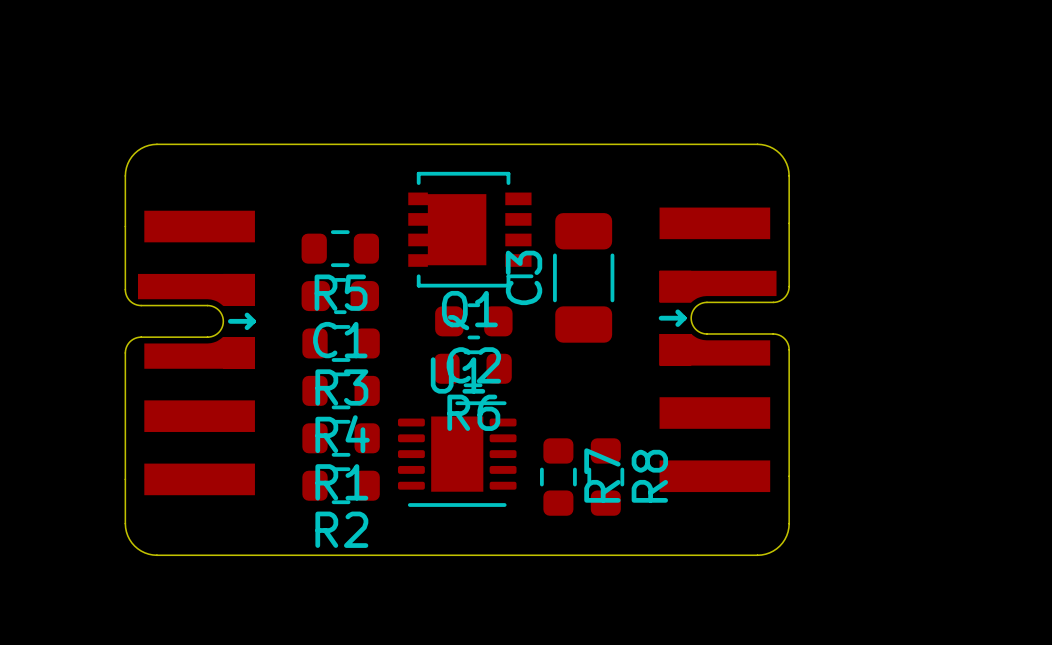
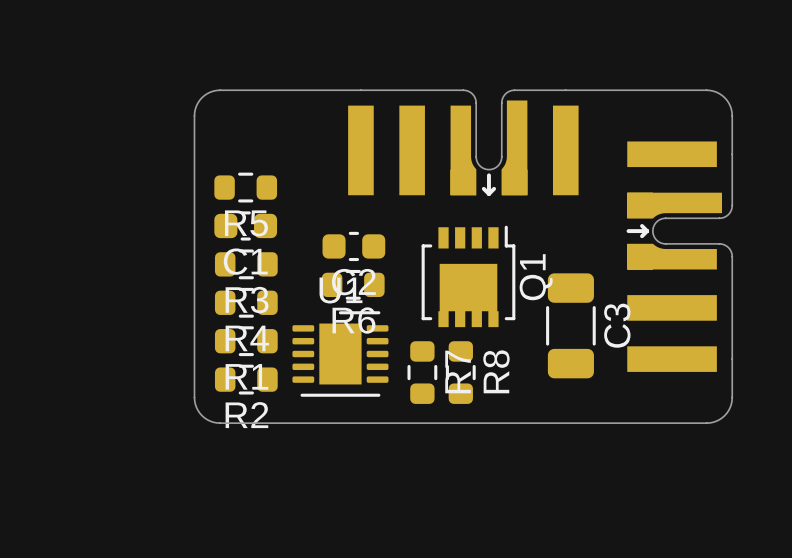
board edge: none -> (360, 90) (216, 90) (204, 95) (196, 106) (194, 115) (194, 397) (196, 407) (204, 417) (220, 423) (709, 422) (722, 417) (730, 407) (732, 397) (732, 359)
board edge: none -> (565, 90) (706, 90) (716, 92) (724, 97) (731, 109) (732, 154)
board edge: (789, 223) (789, 175) (786, 163) (776, 150) (761, 144) (156, 144) (144, 146) (137, 150) (127, 163) (125, 175) (125, 226) -> none
Q1 rotation: 0° (470, 229) -> 90° counterclockwise (468, 276)
Q1 position: (470, 229) -> (468, 276)
C3 name position: C3 (524, 277) -> C3 (617, 325)
C3 position: (583, 277) -> (570, 325)
part position: (724, 349) -> (679, 256)
part rotation: 0° (190, 352) -> 90° clockwise (463, 142)
part position: (190, 352) -> (463, 142)
board edge: (789, 476) (789, 523) (786, 535) (776, 548) (769, 552) (757, 555) (152, 554) (137, 548) (127, 535) (125, 523) (125, 479) -> none

